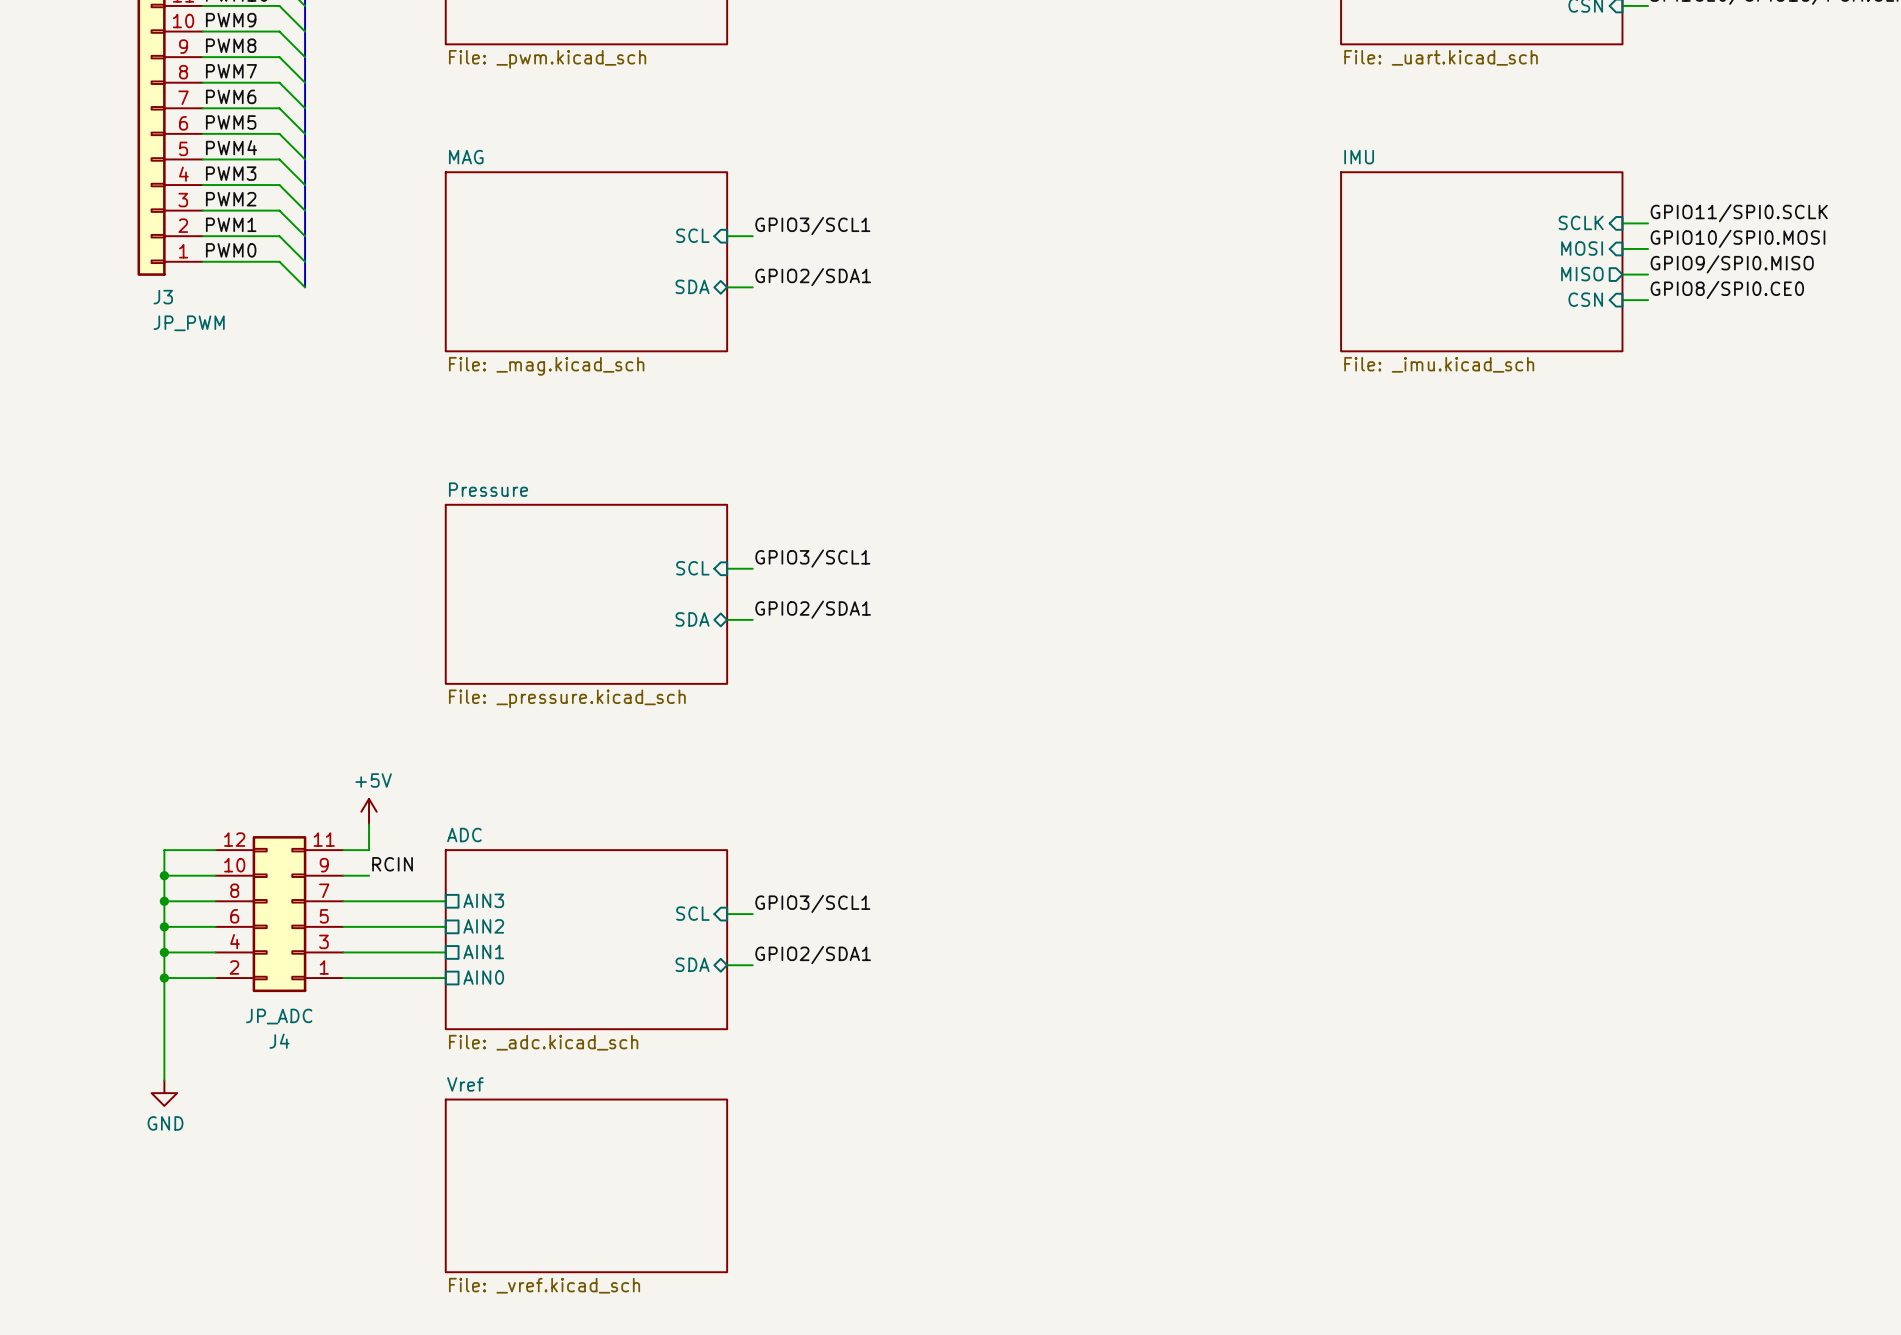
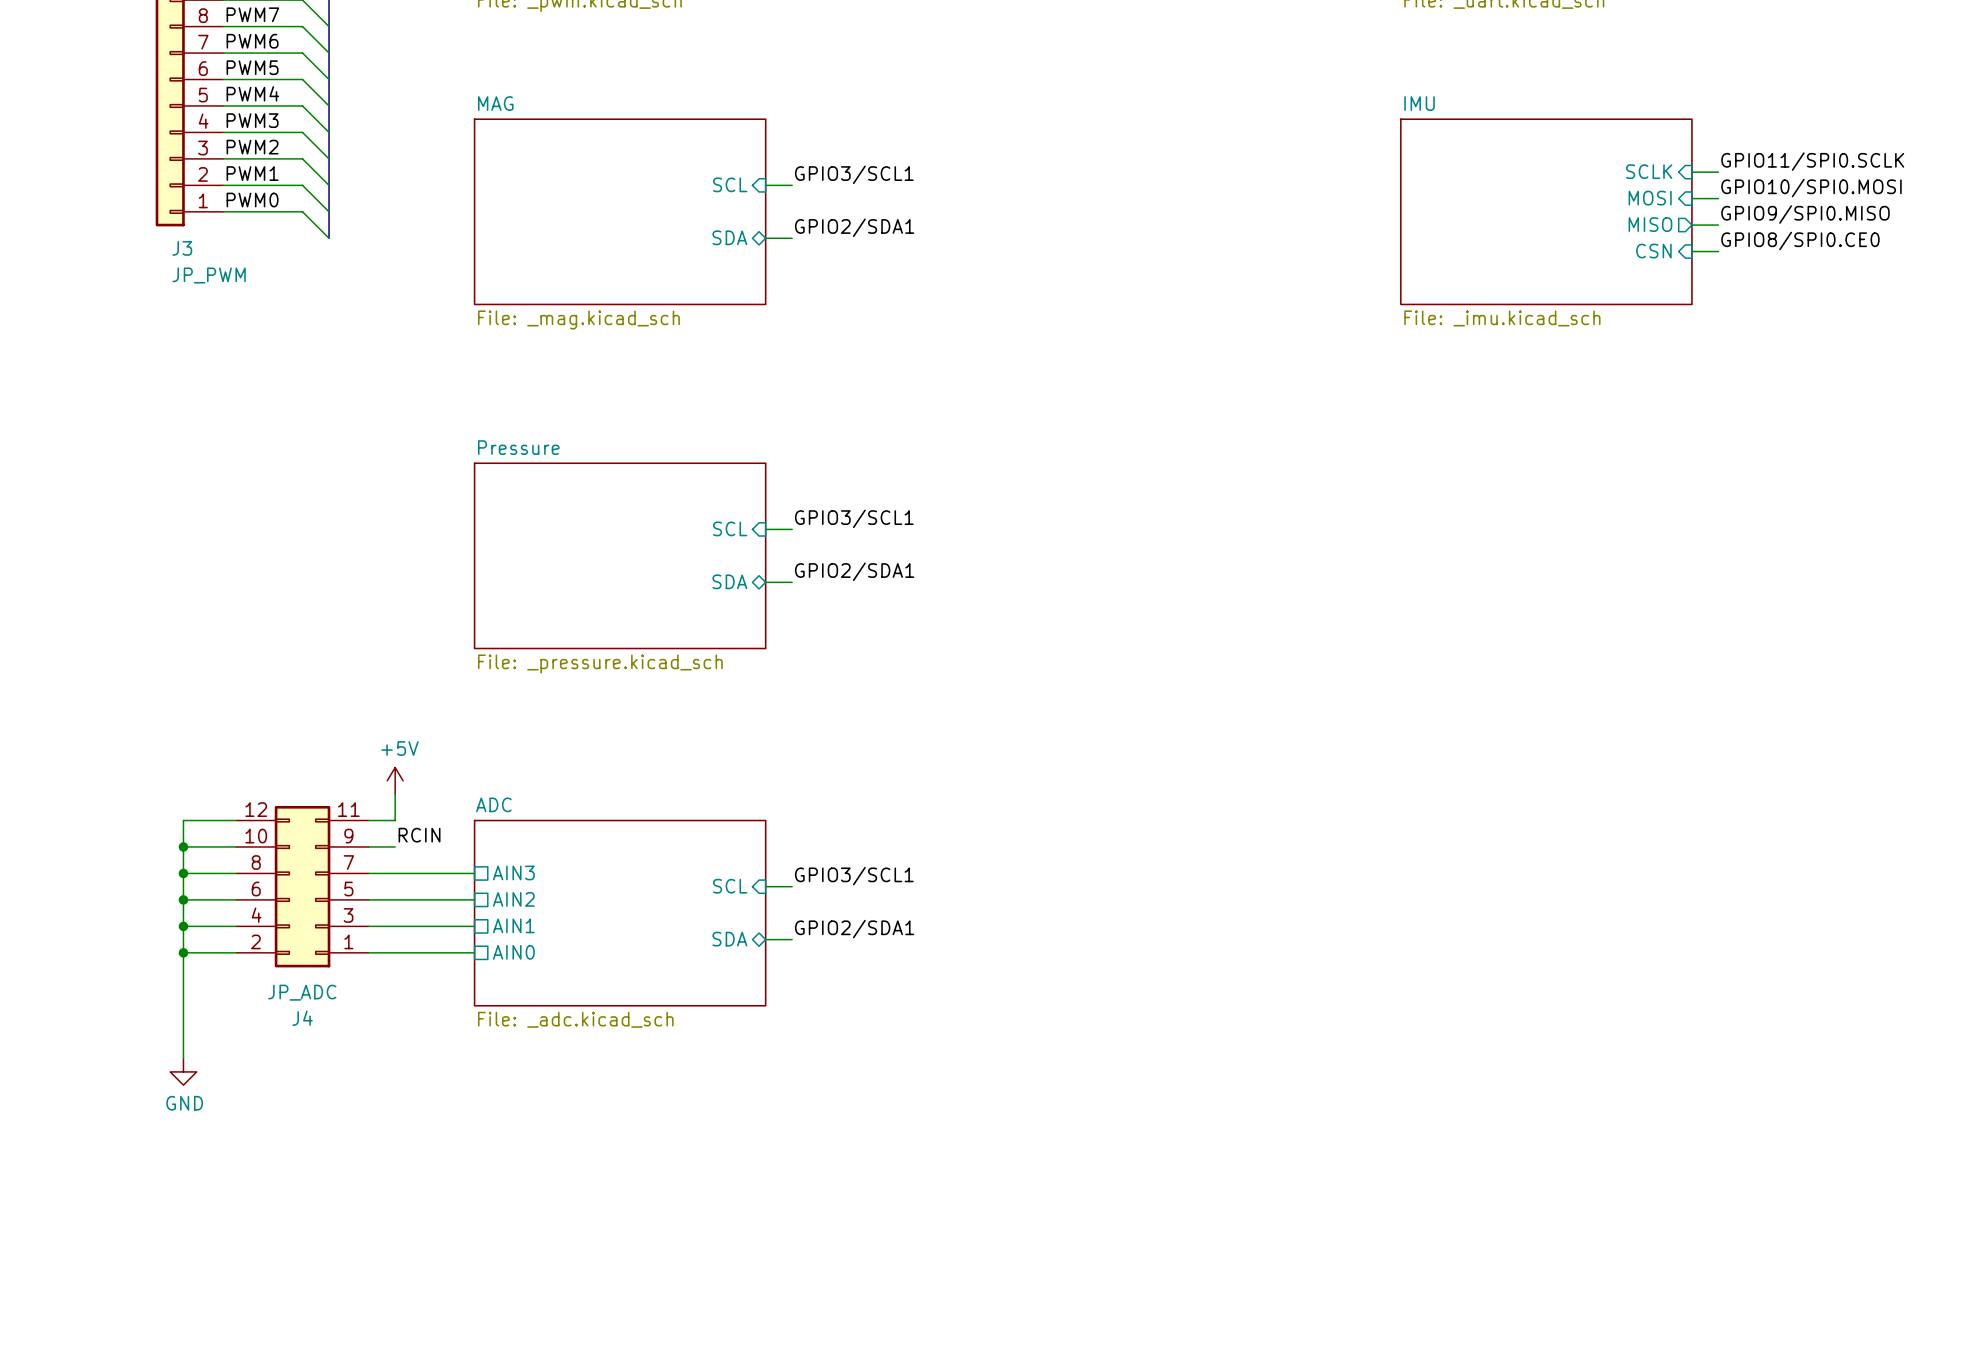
sheet Vref: File: _vref.kicad_sch (586, 1185) -> none

